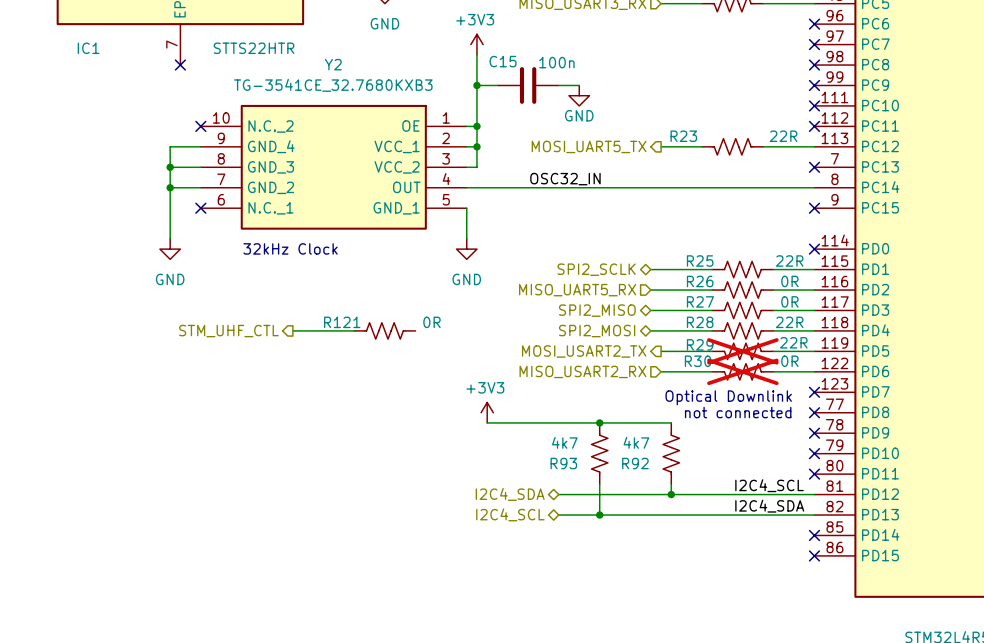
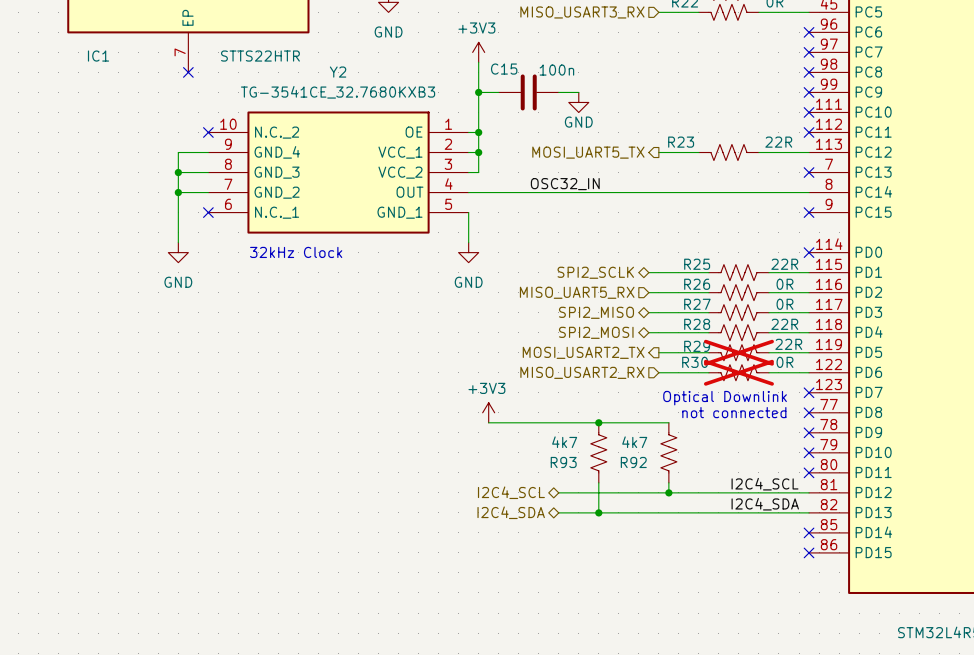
wire: (292, 330) (354, 330) -> none
R121: 0R (384, 330) -> none
hierarchical label: STM_UHF_CTL (228, 331) -> none
hierarchical label: I2C4_SDA (510, 494) -> I2C4_SCL (511, 492)
hierarchical label: I2C4_SCL (510, 514) -> I2C4_SDA (511, 512)

